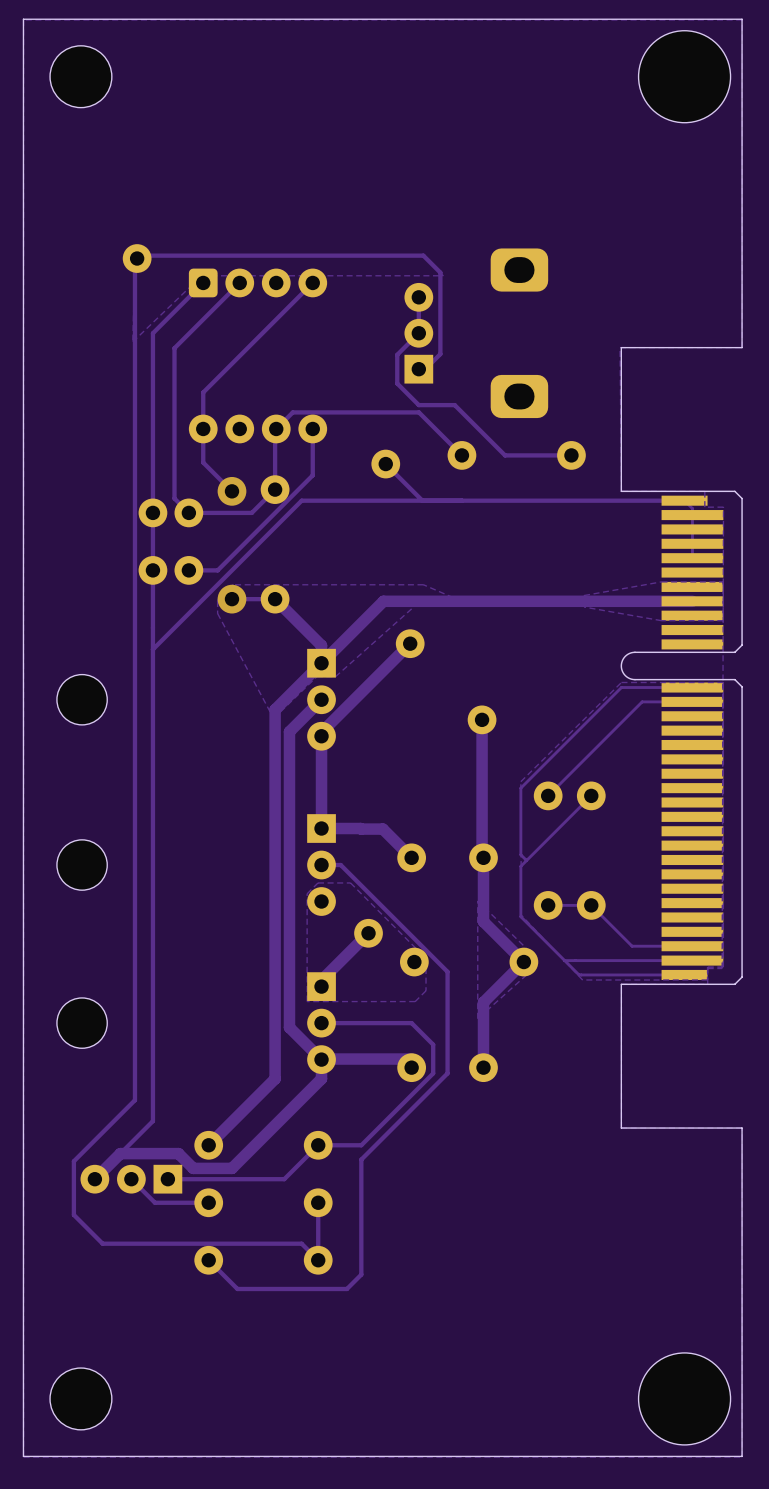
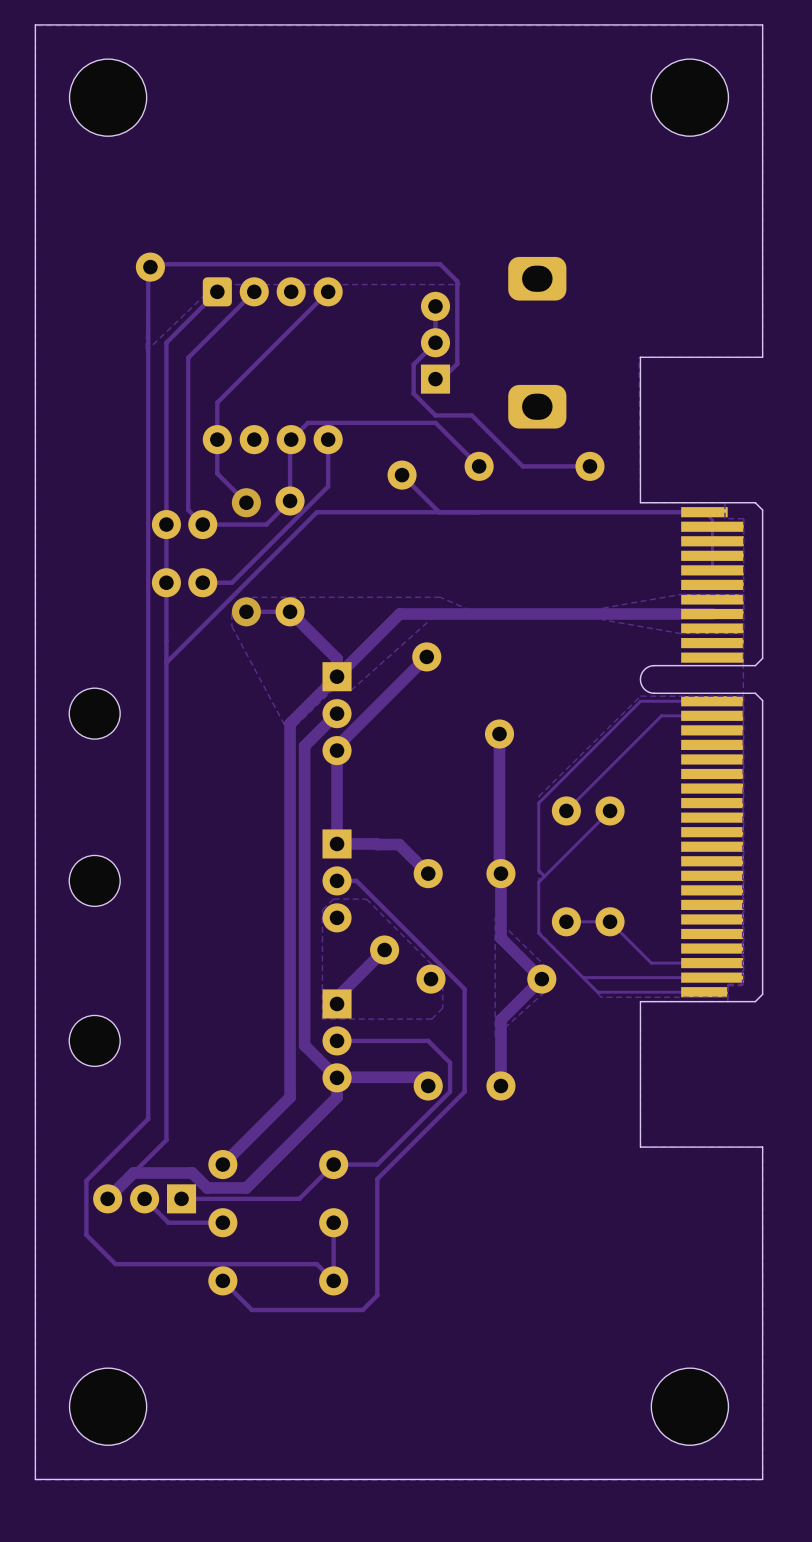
part: (80, 76) -> none
part: (684, 76) -> none
part: none -> (108, 97)
part: none -> (689, 97)
part: none -> (108, 1406)
part: none -> (689, 1406)
part: (80, 1398) -> none
part: (684, 1398) -> none

